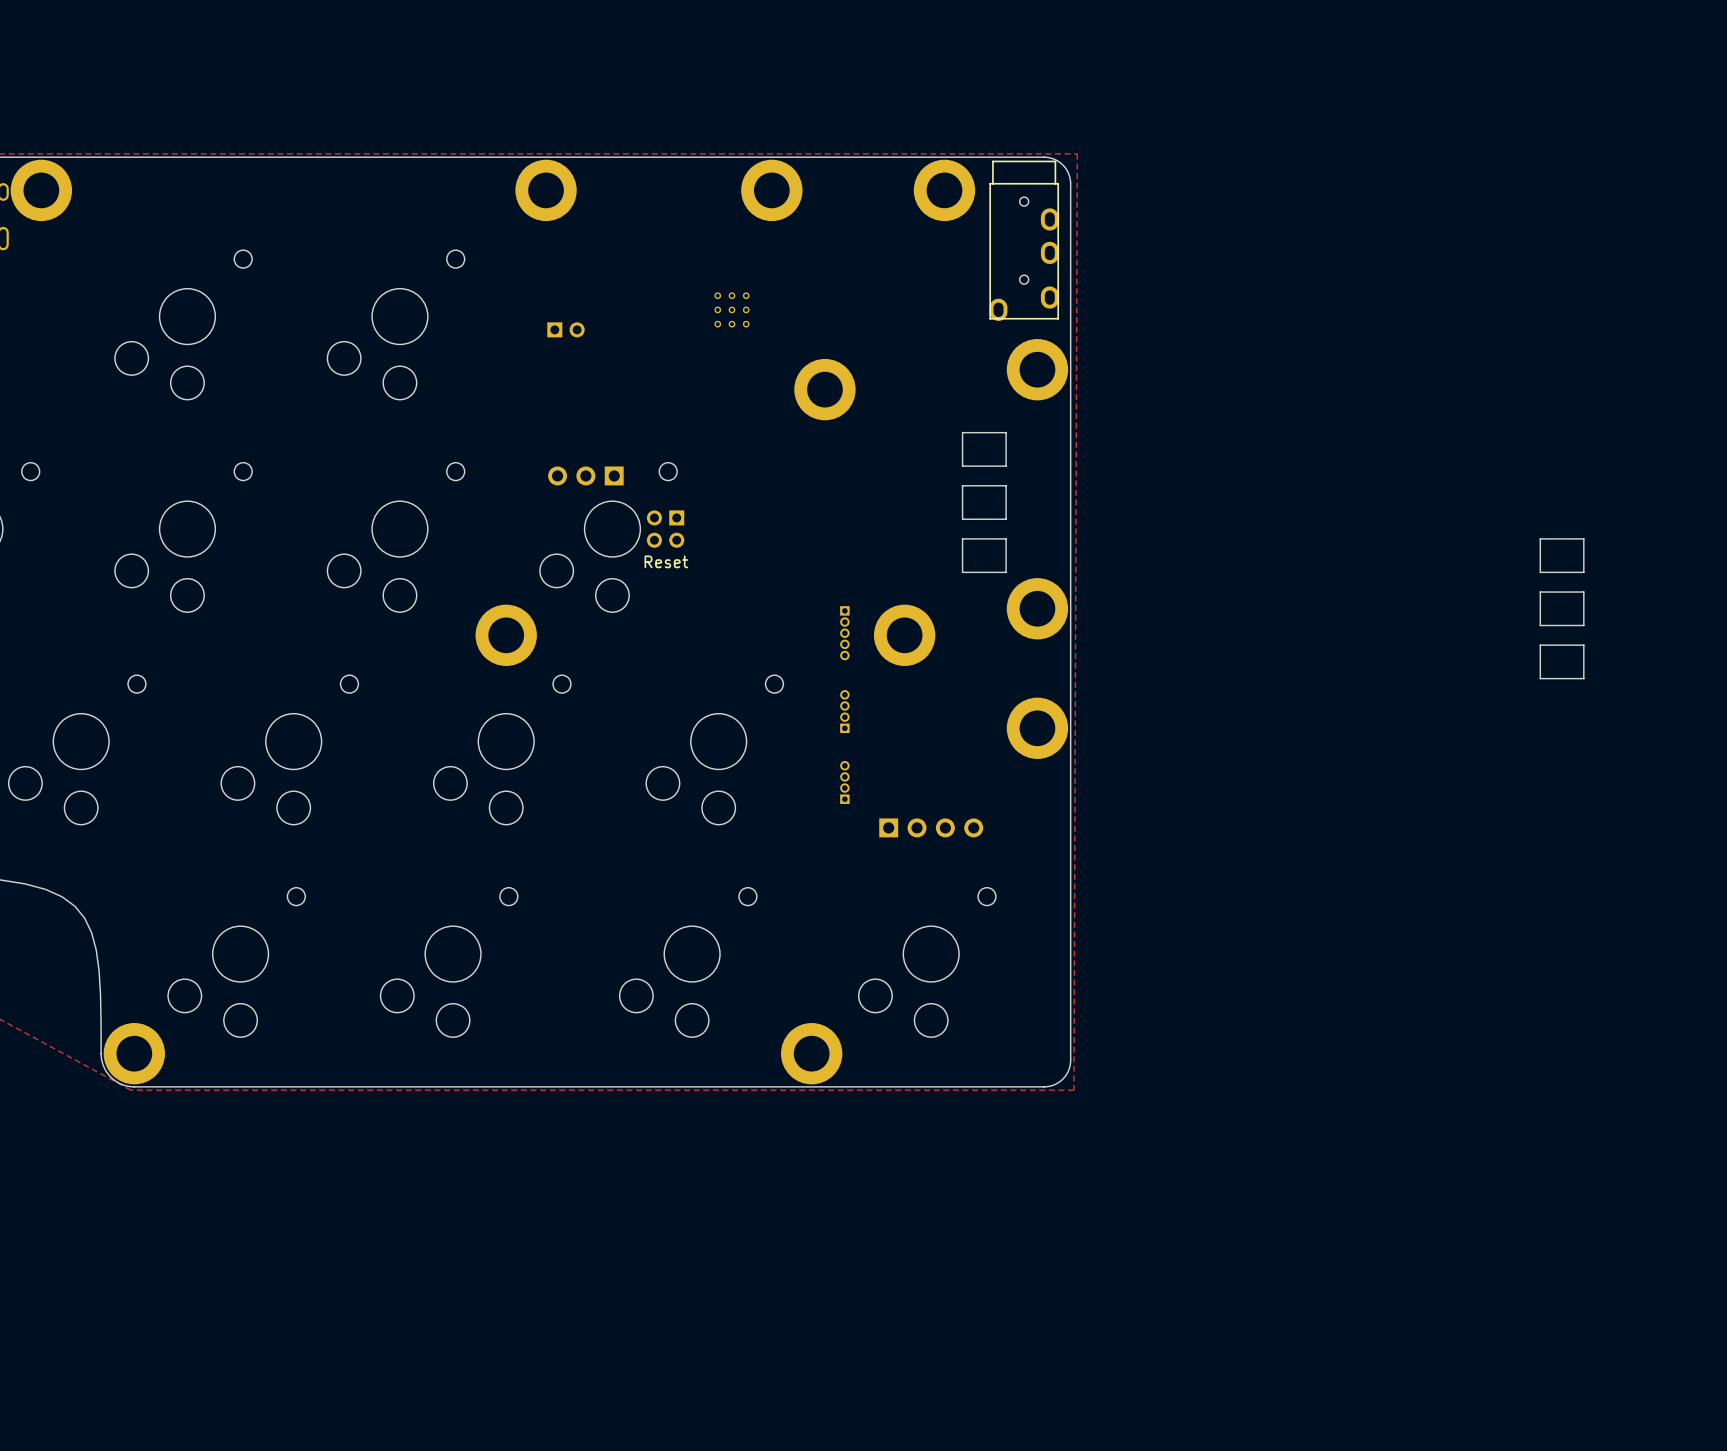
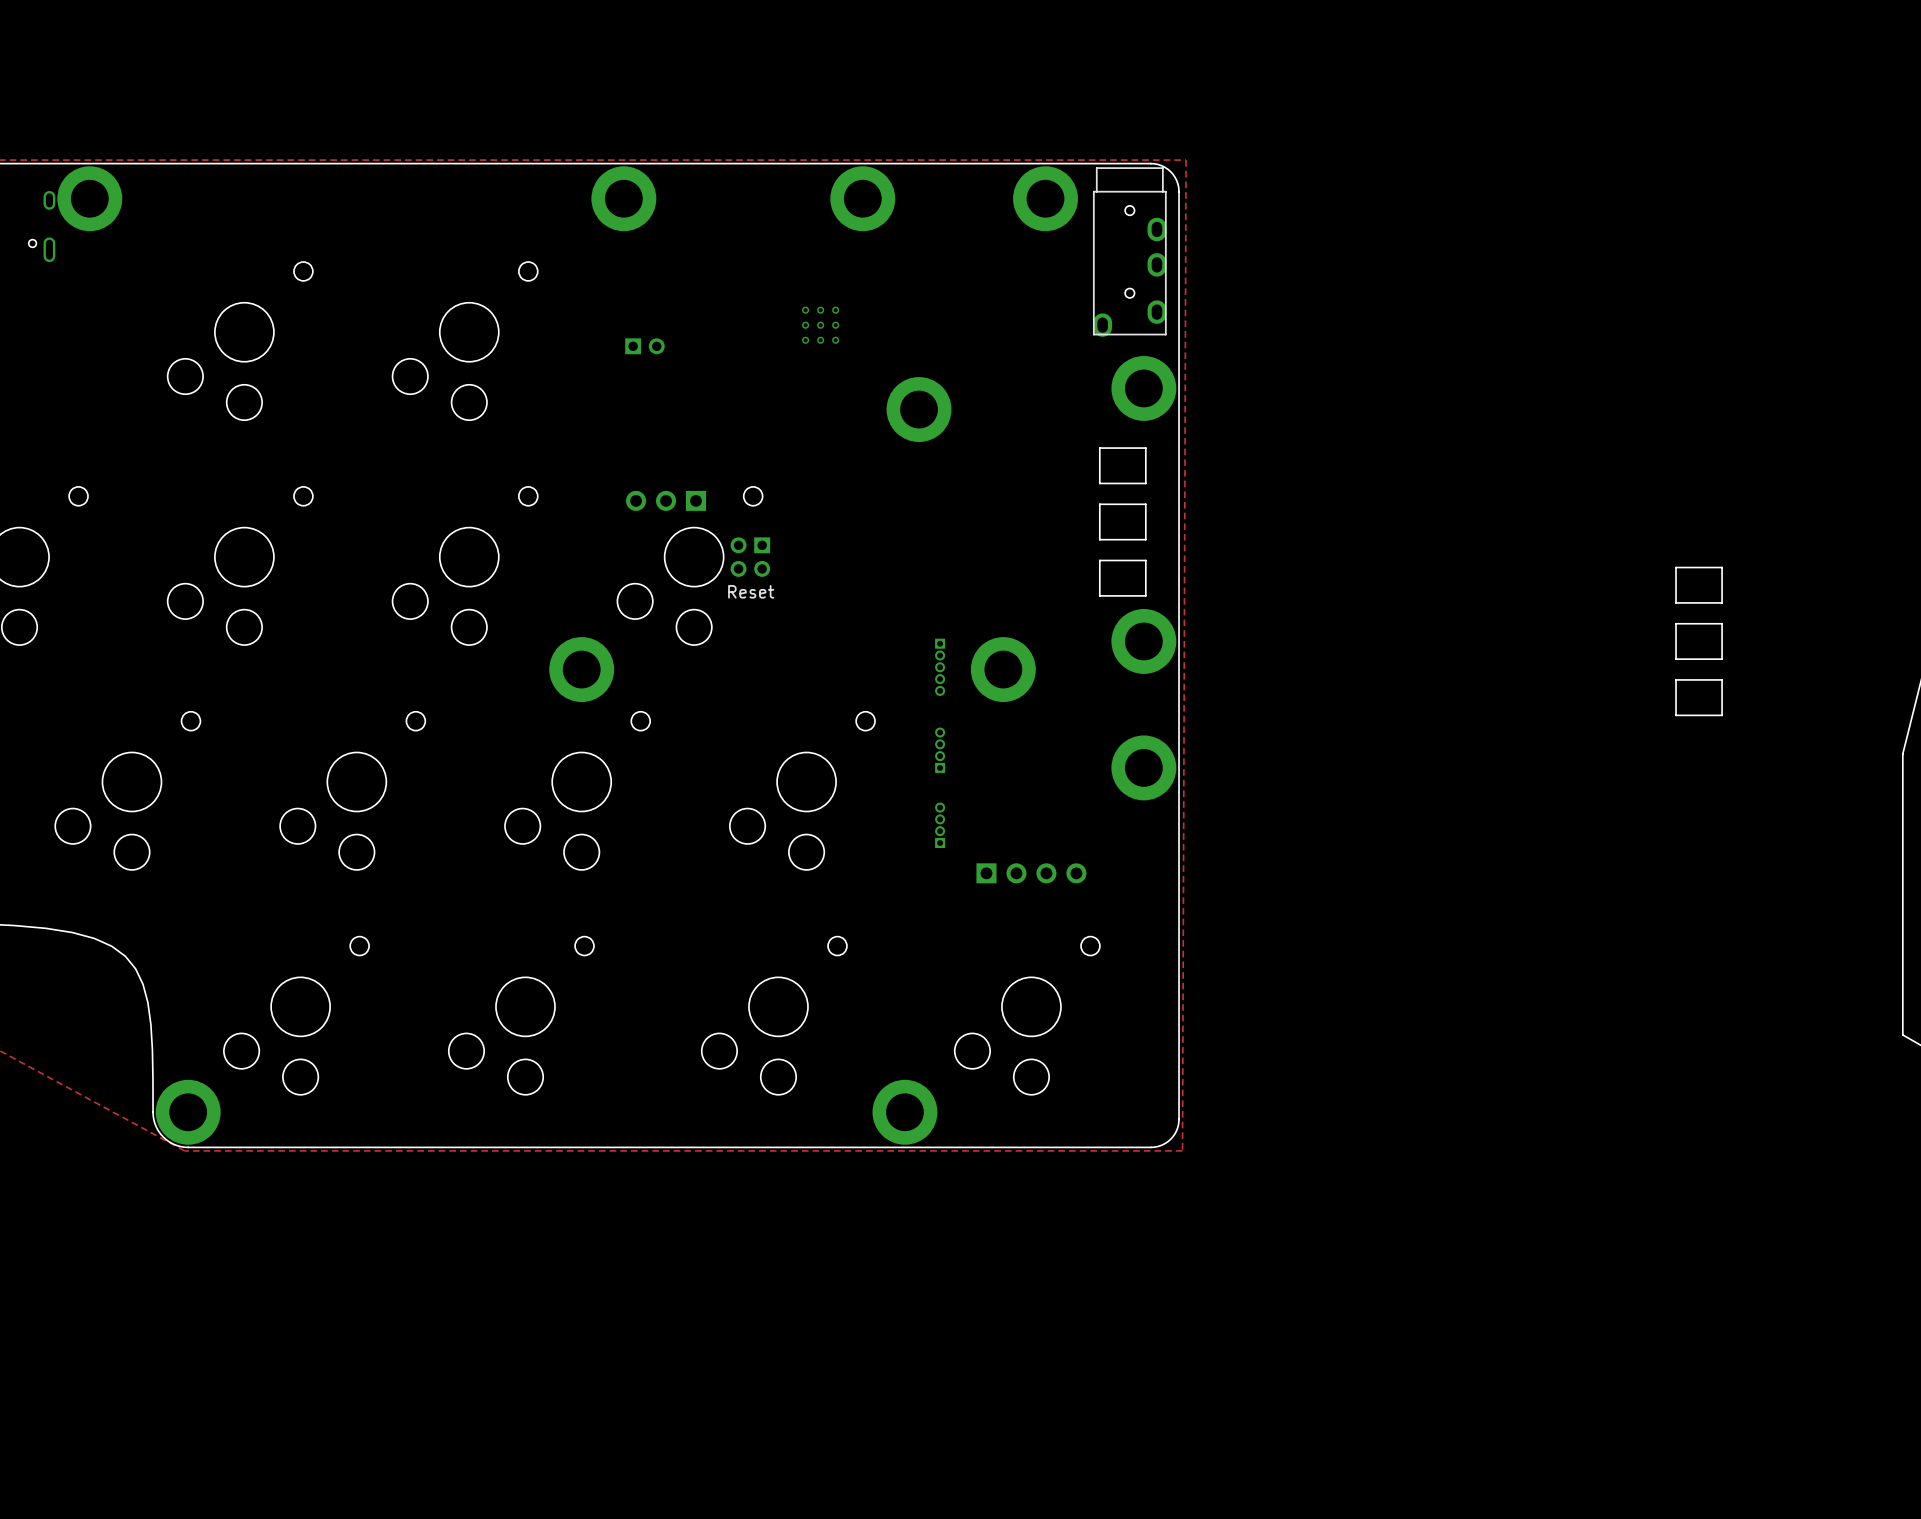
part: none -> (1122, 465)
part: (984, 449) -> none
part: none -> (1122, 521)
part: (984, 502) -> none
part: none -> (1122, 578)
part: (984, 555) -> none

